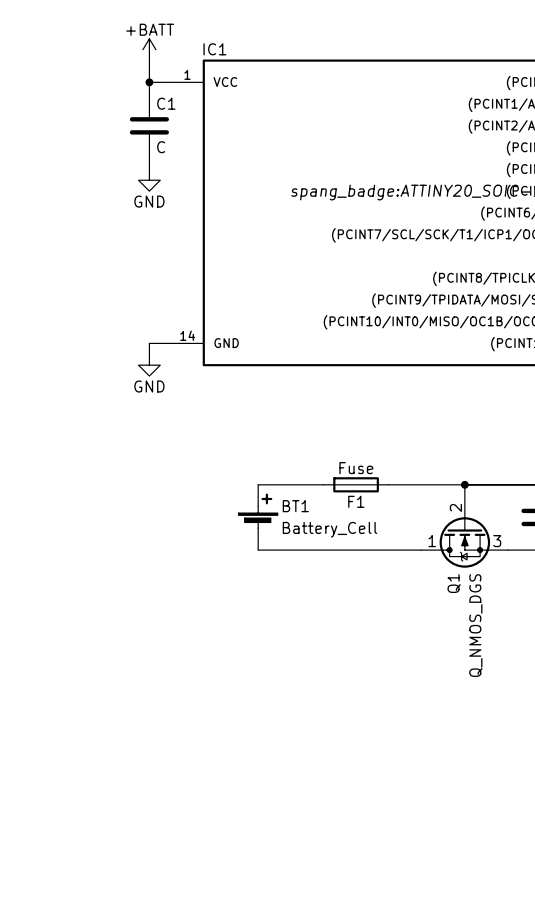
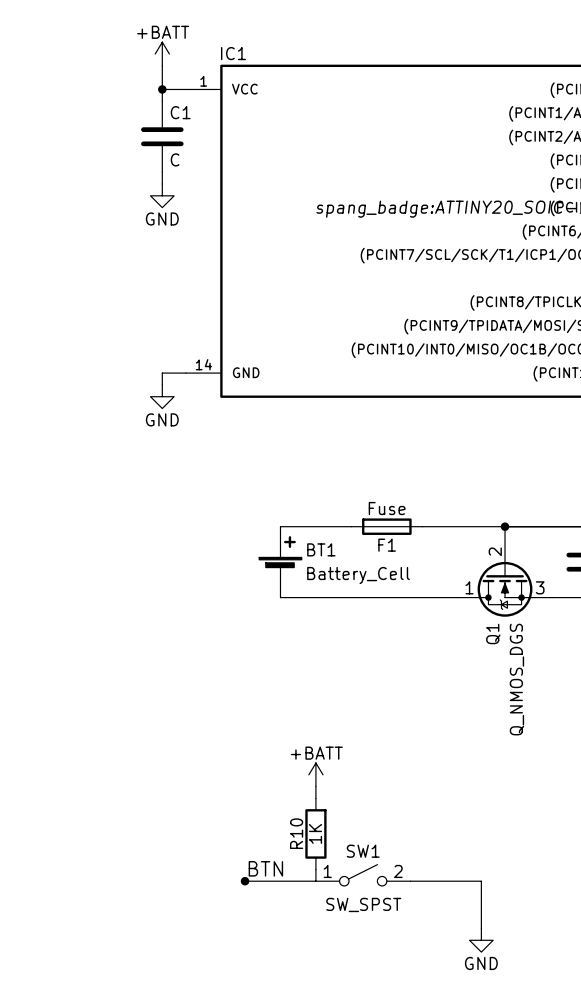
power symbol: none -> +BATT (315, 774)
wire: none -> (315, 786) (315, 798)
R10: none -> 1K (315, 833)
label: none -> BTN (265, 868)
wire: none -> (315, 869) (315, 881) (245, 881)
SW1: none -> SW_SPST (363, 875)
junction: none -> (245, 881)
wire: none -> (410, 881) (481, 881) (481, 928)
power symbol: none -> GND (481, 940)

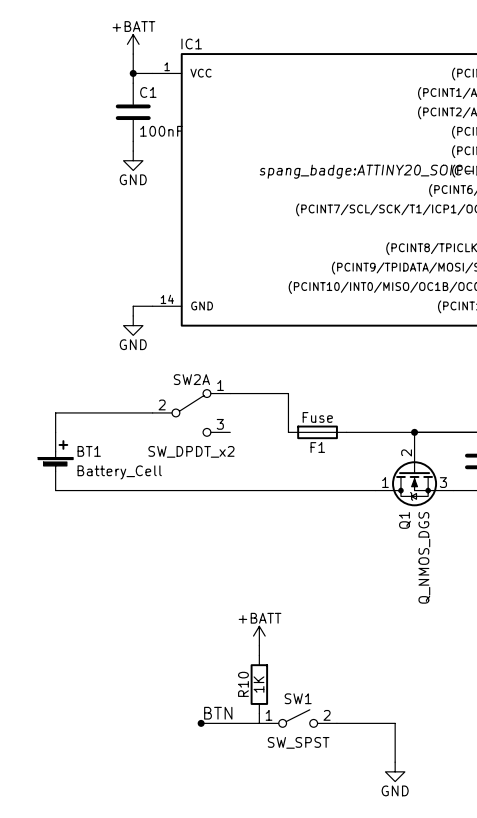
C1 value: C (175, 159) -> 100nF (161, 131)
wire: none -> (152, 412) (55, 412) (55, 432)
SW2A: none -> SW_DPDT_x2 (191, 412)
wire: (280, 526) (351, 526) -> (230, 393) (288, 393) (288, 432)
BT1 position: (280, 562) -> (55, 461)
wire: none -> (55, 490) (230, 490)

